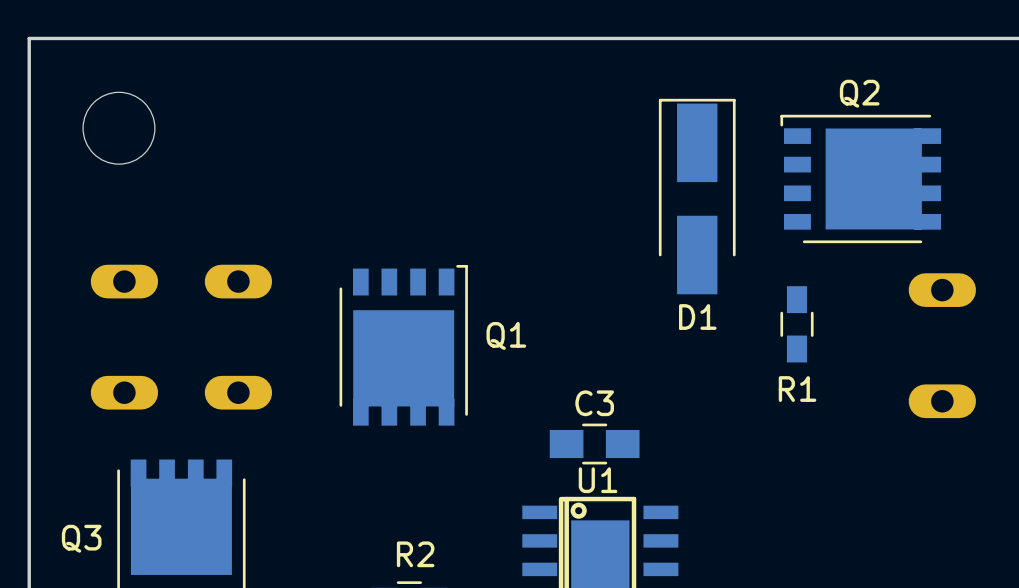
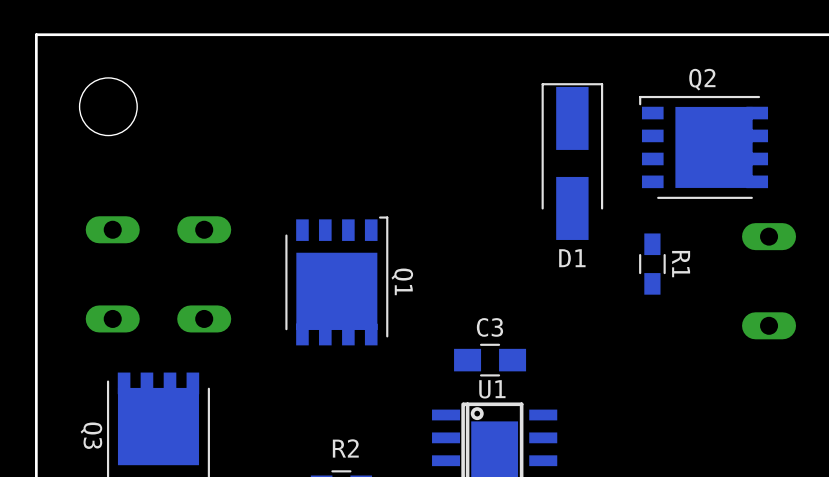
Q1 name rotation: 0° (506, 335) -> 90° clockwise (402, 281)
R1 name rotation: 0° (797, 389) -> 90° clockwise (681, 264)
R1 name position: R1 (797, 389) -> R1 (681, 264)
Q3 name rotation: 0° (81, 538) -> 90° clockwise (91, 435)

